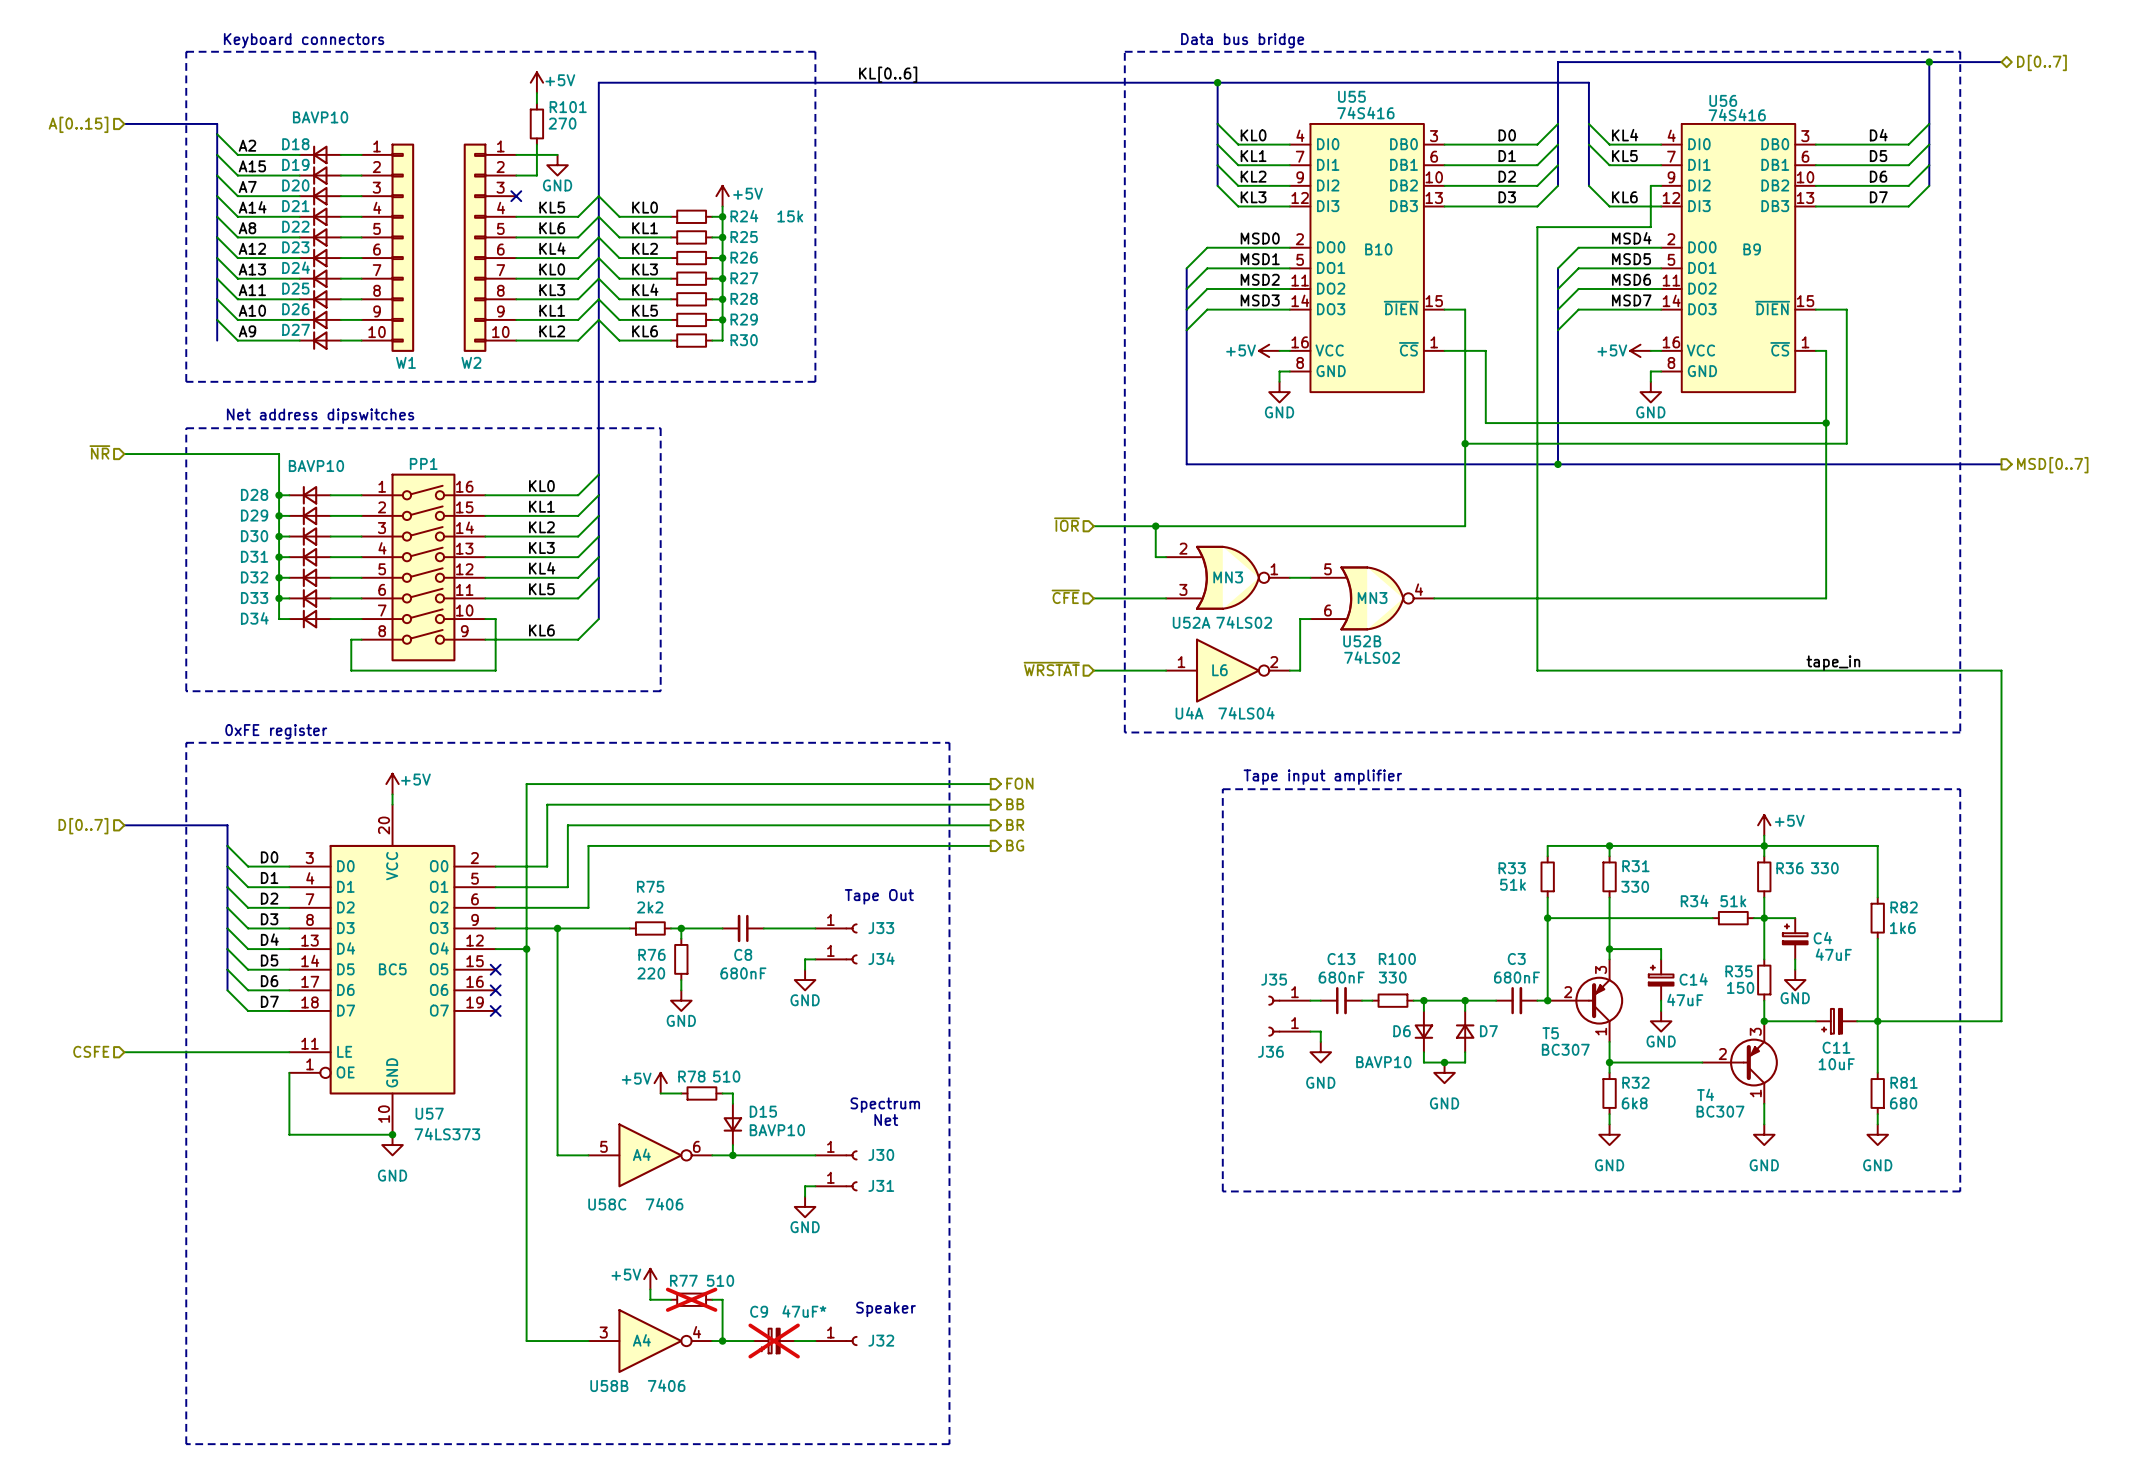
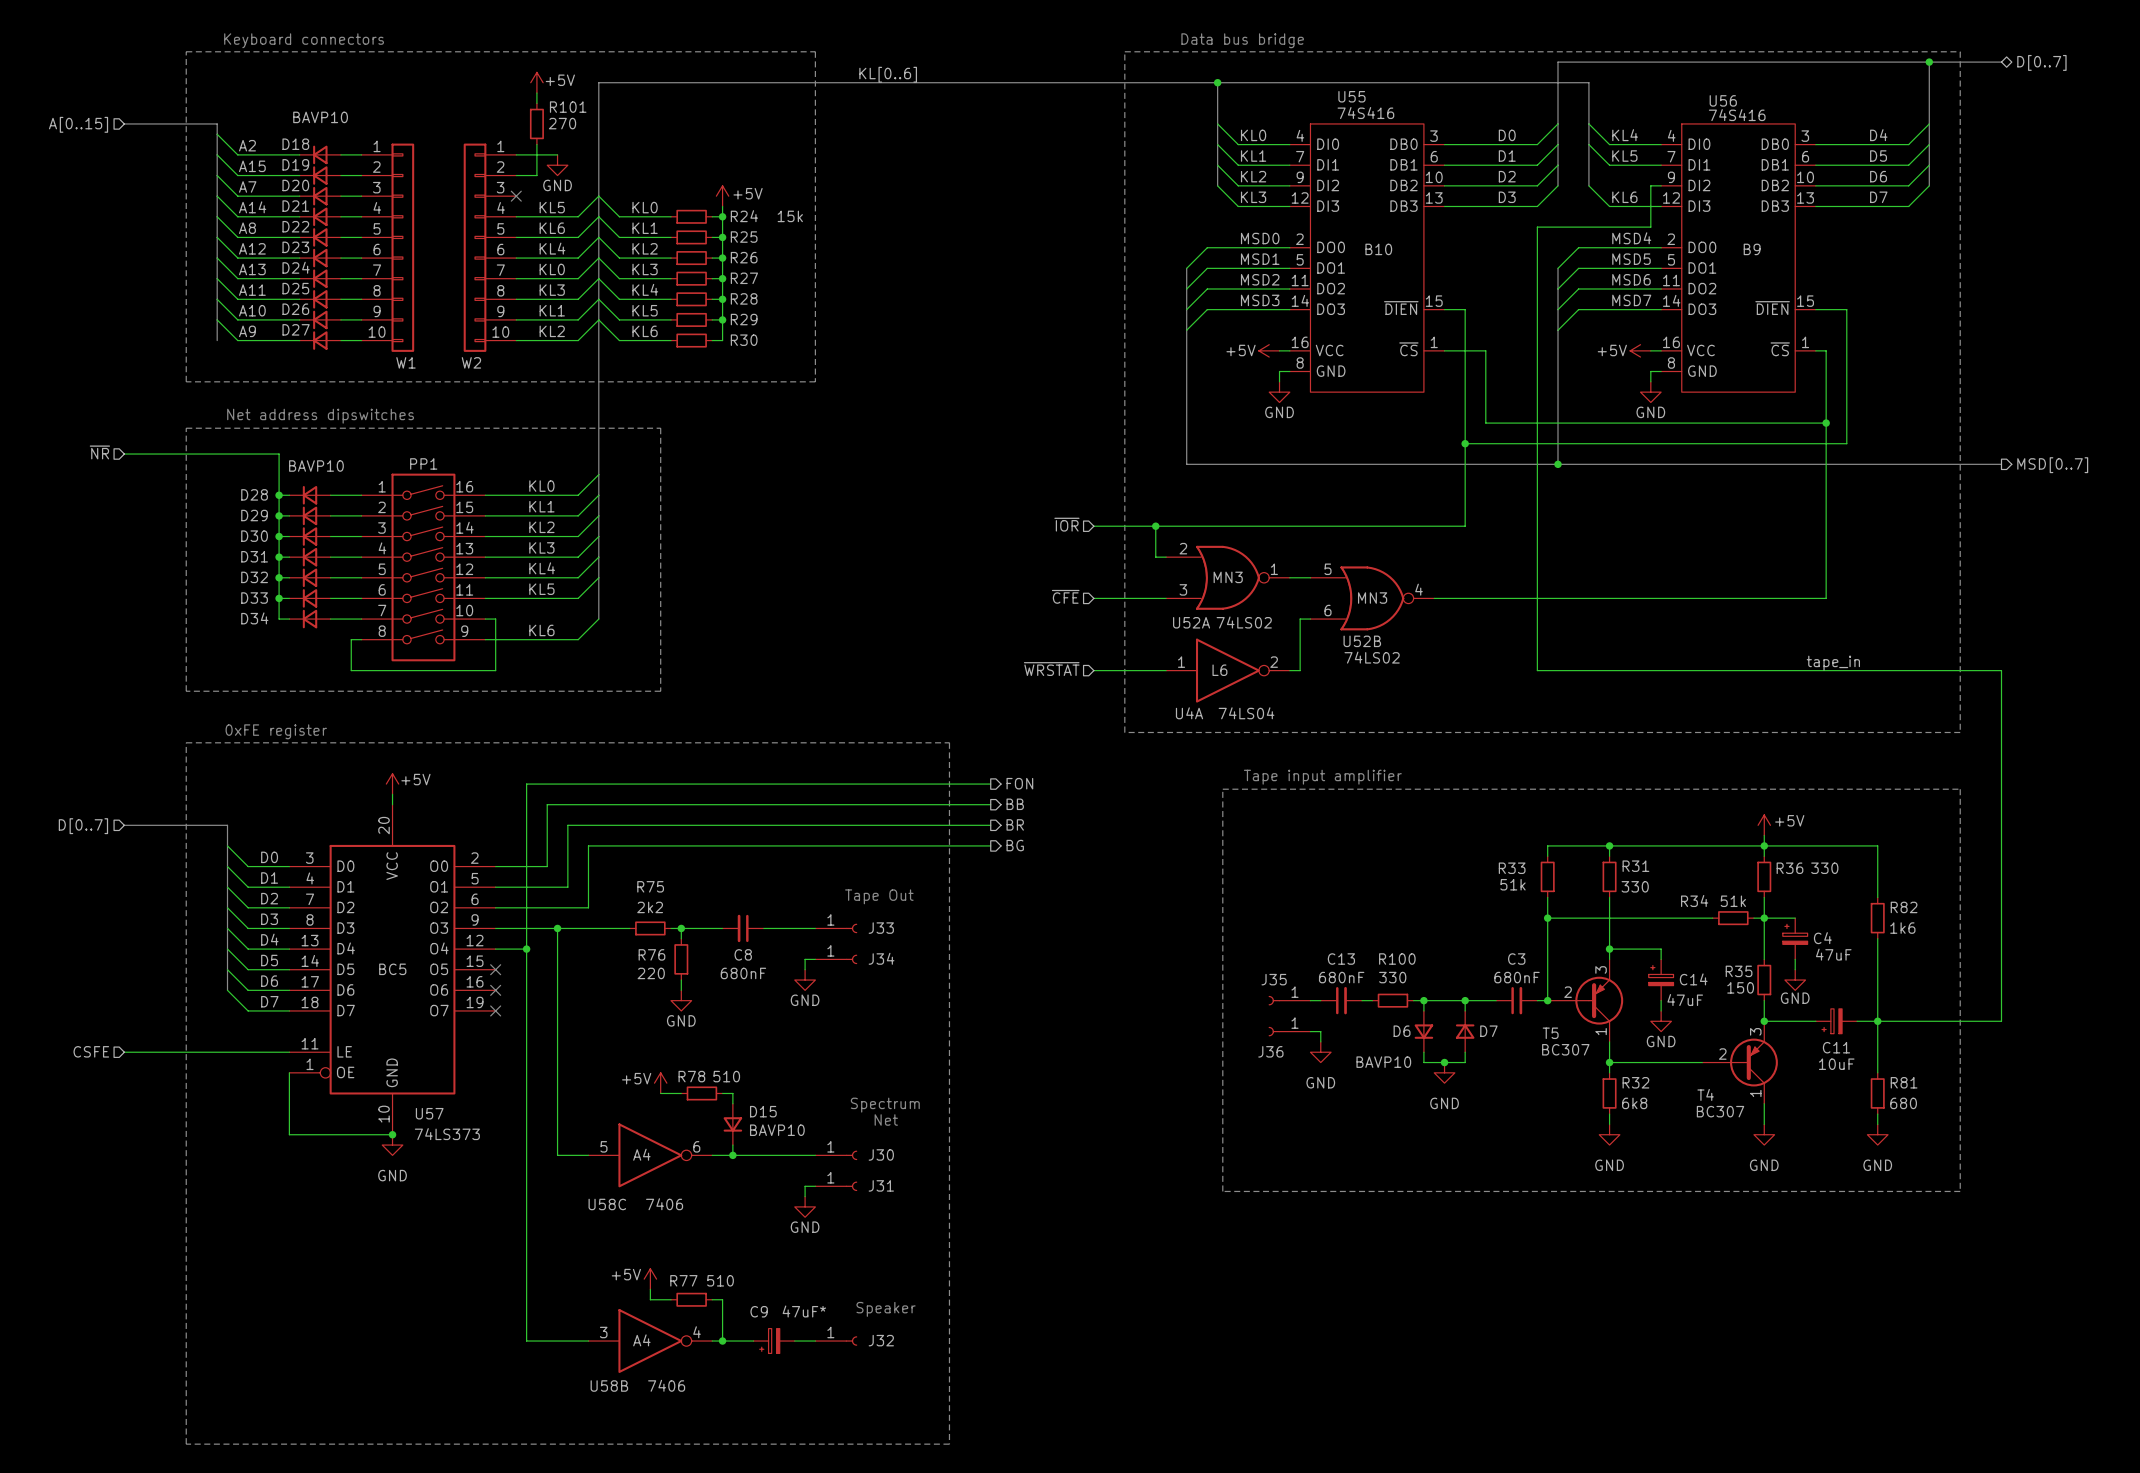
R77 do-not-place cross: (691, 1299) -> none
C9 do-not-place cross: (774, 1341) -> none

